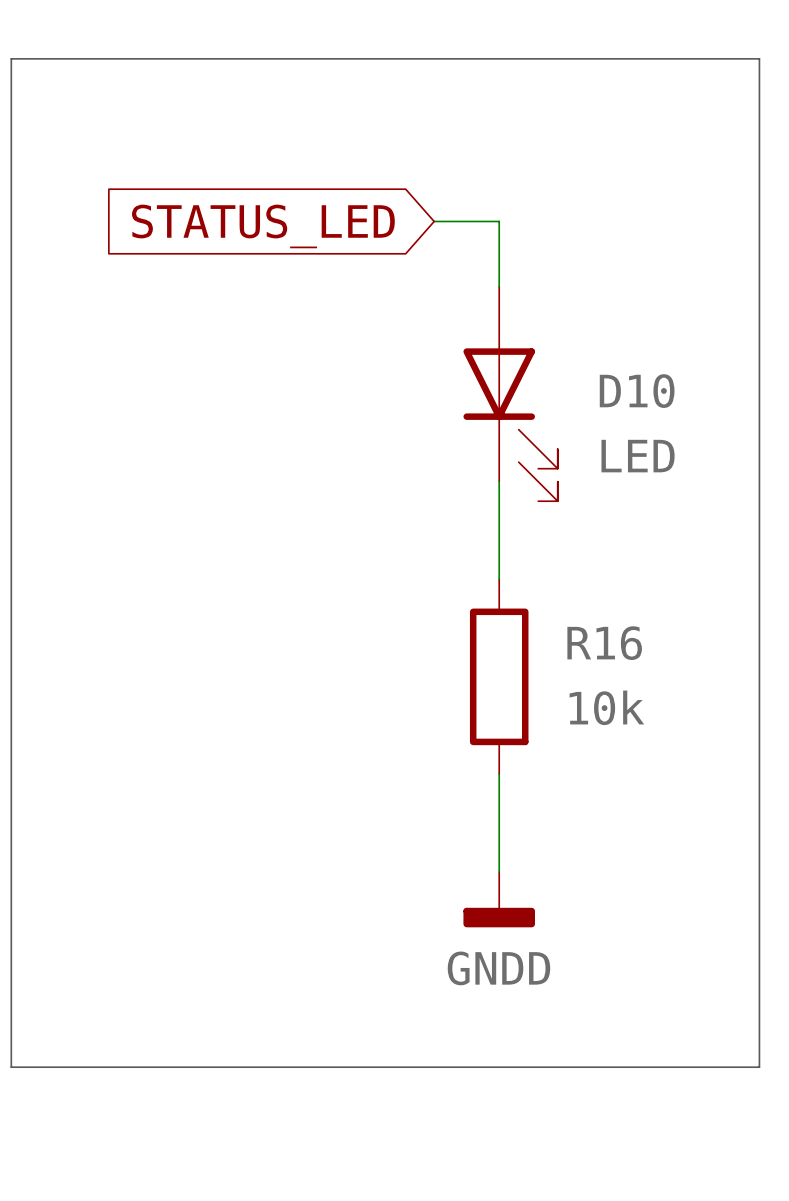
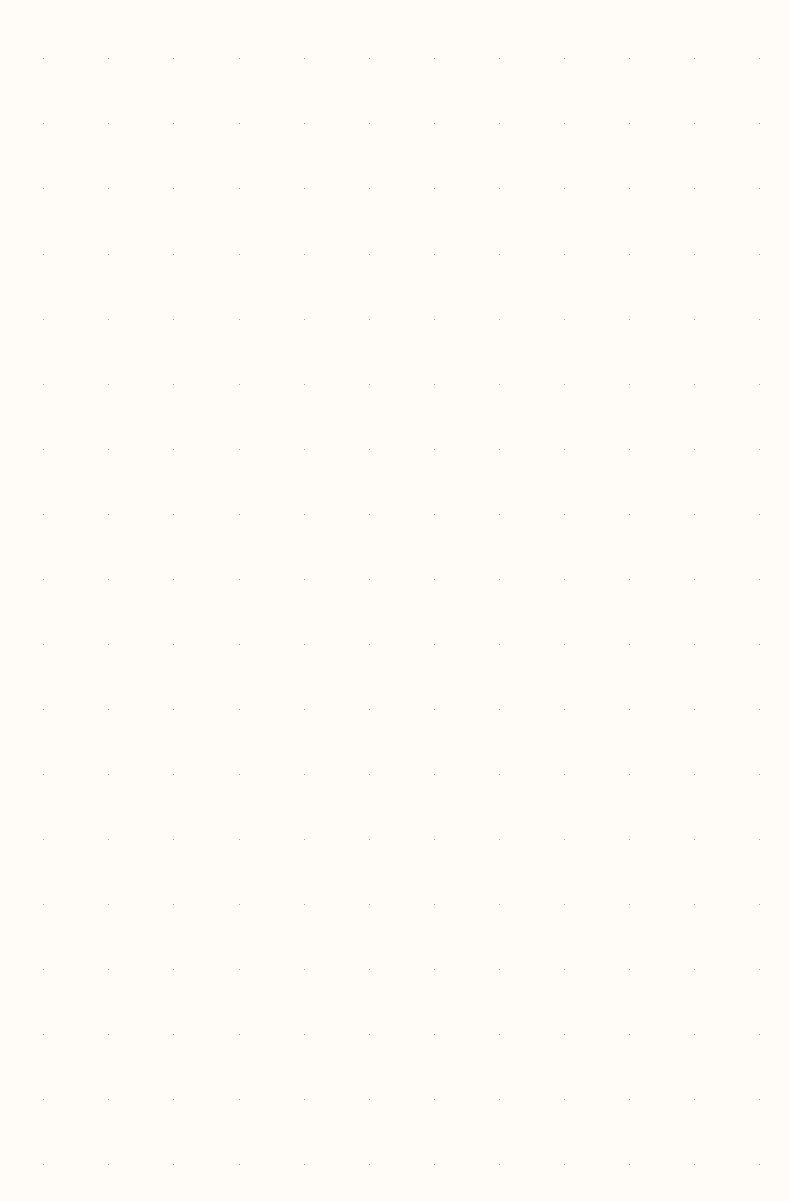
line: (11, 58) (759, 58) (759, 1067) (11, 1067) (11, 58) -> none
wire: (434, 221) (499, 221) (499, 286) -> none
global label: STATUS_LED (263, 226) -> none
D10: LED (510, 393) -> none
wire: (499, 481) (499, 579) -> none
R16: 10k (499, 676) -> none
wire: (499, 774) (499, 872) -> none
power symbol: GNDD (499, 899) -> none

